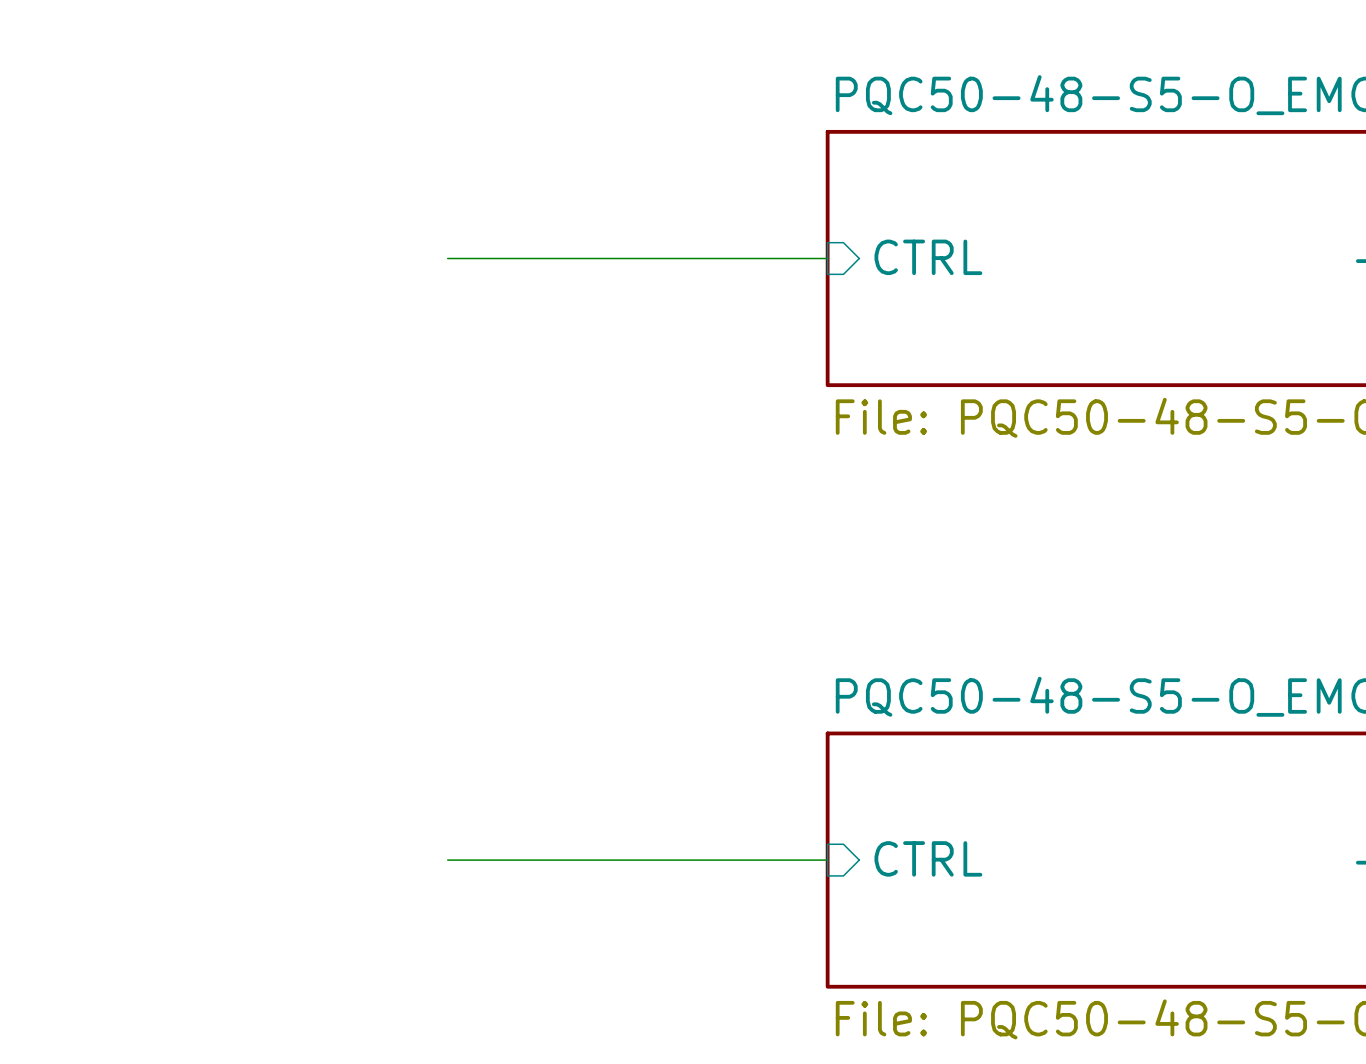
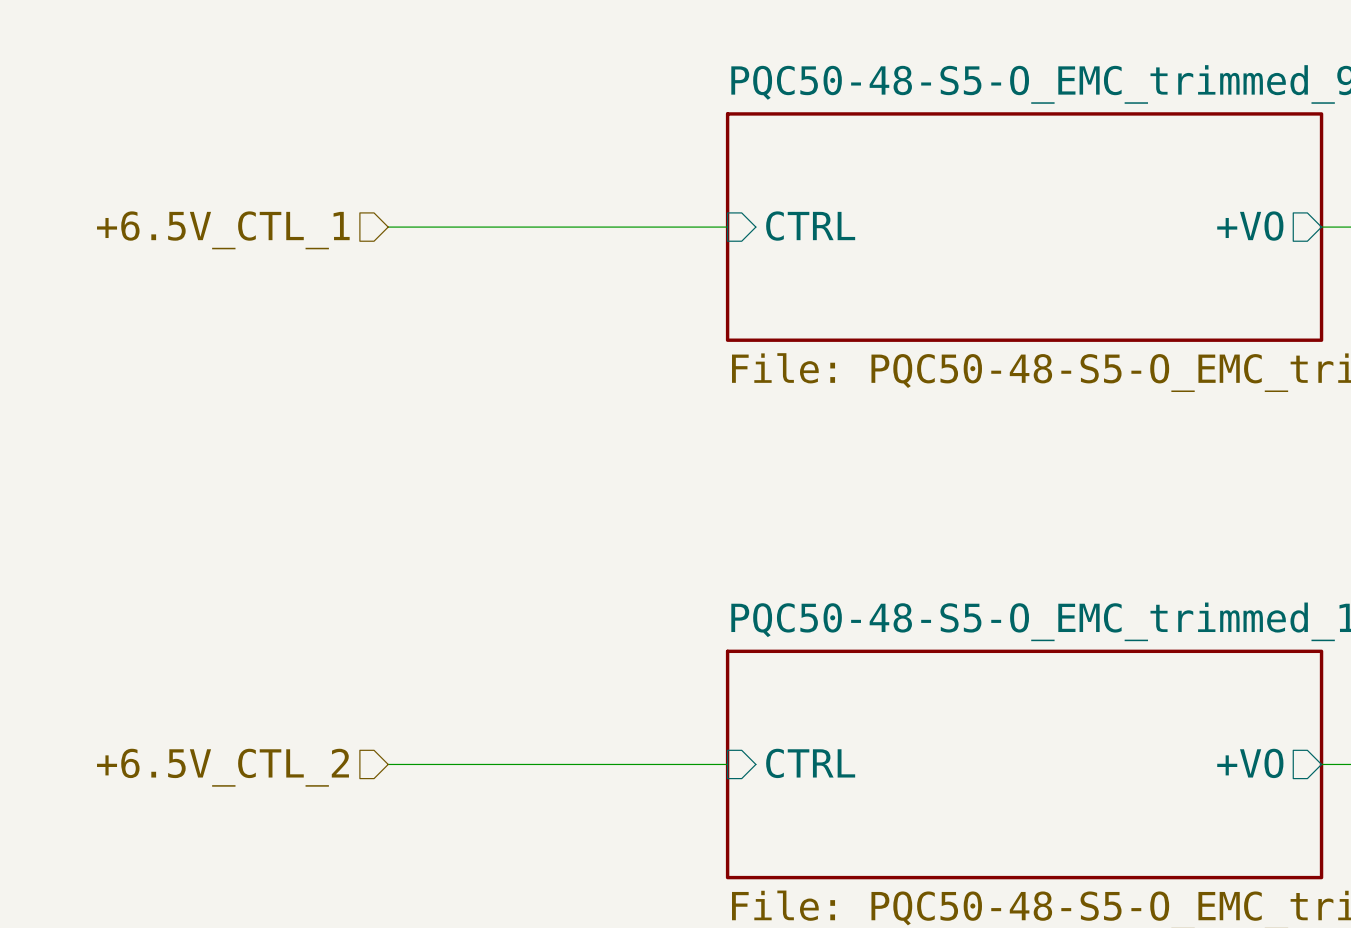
hierarchical label: none -> +6.5V_CTL_1 (223, 230)
hierarchical label: none -> +6.5V_CTL_2 (222, 767)

